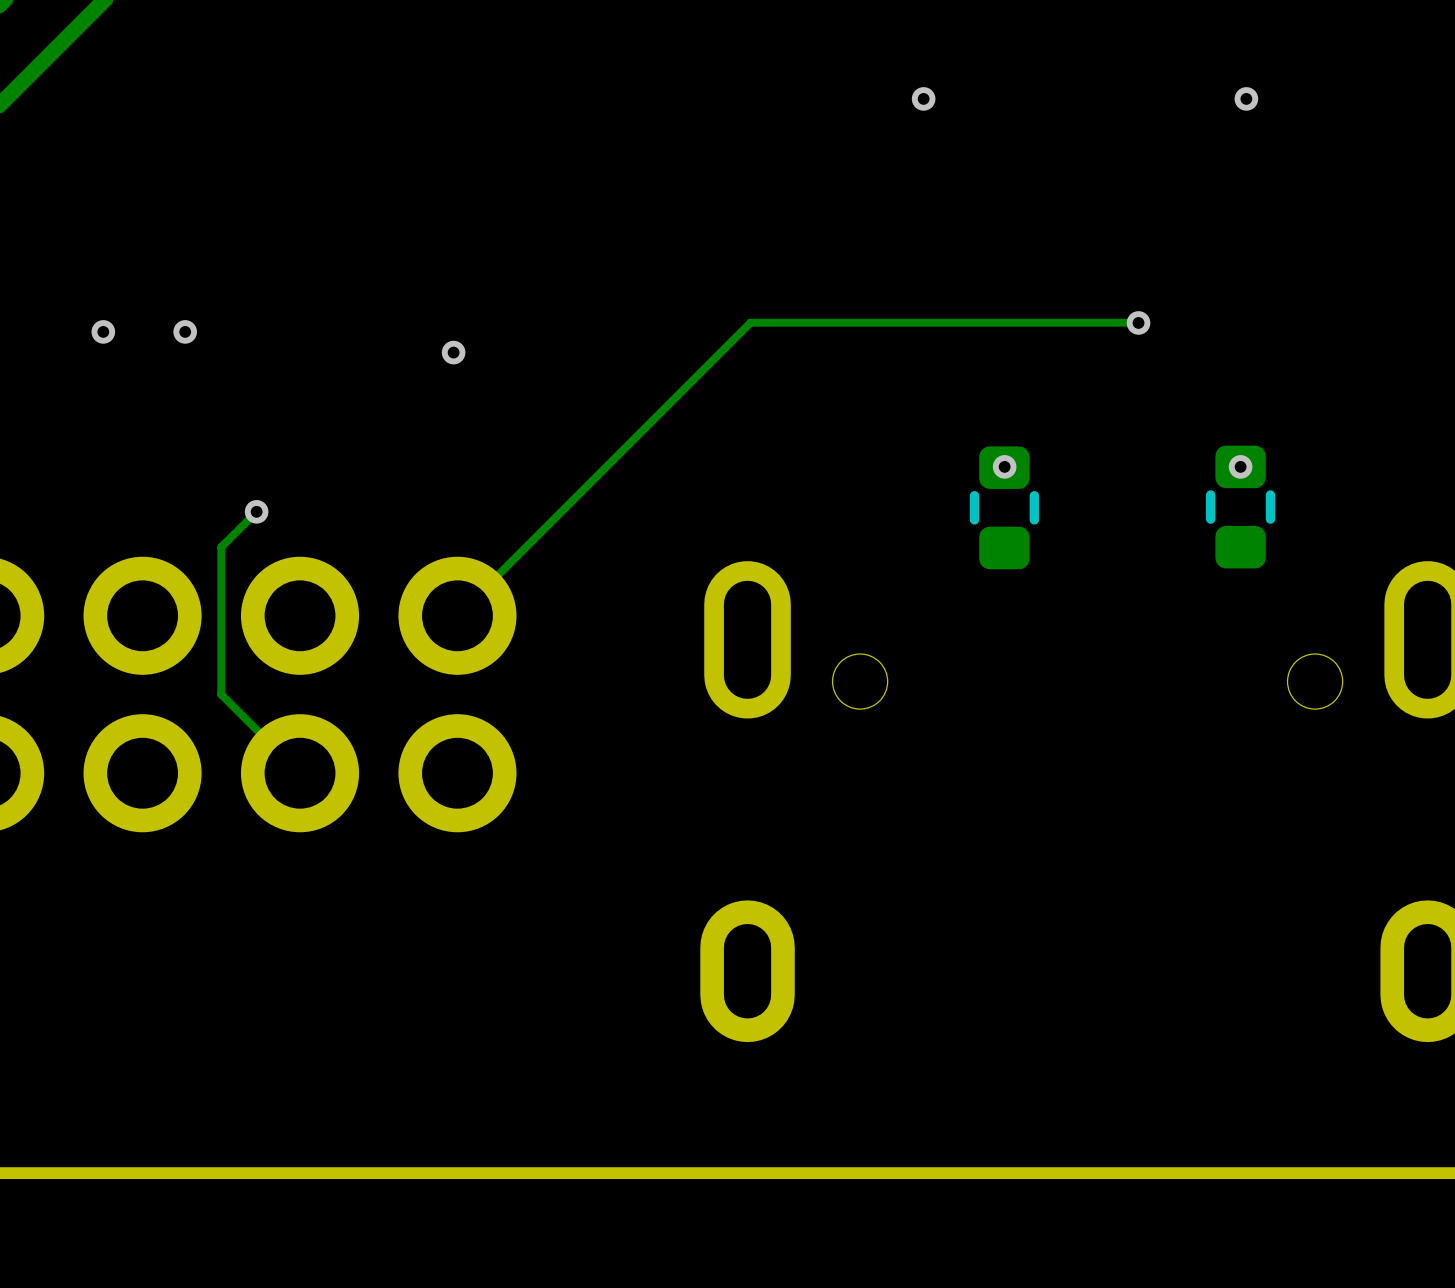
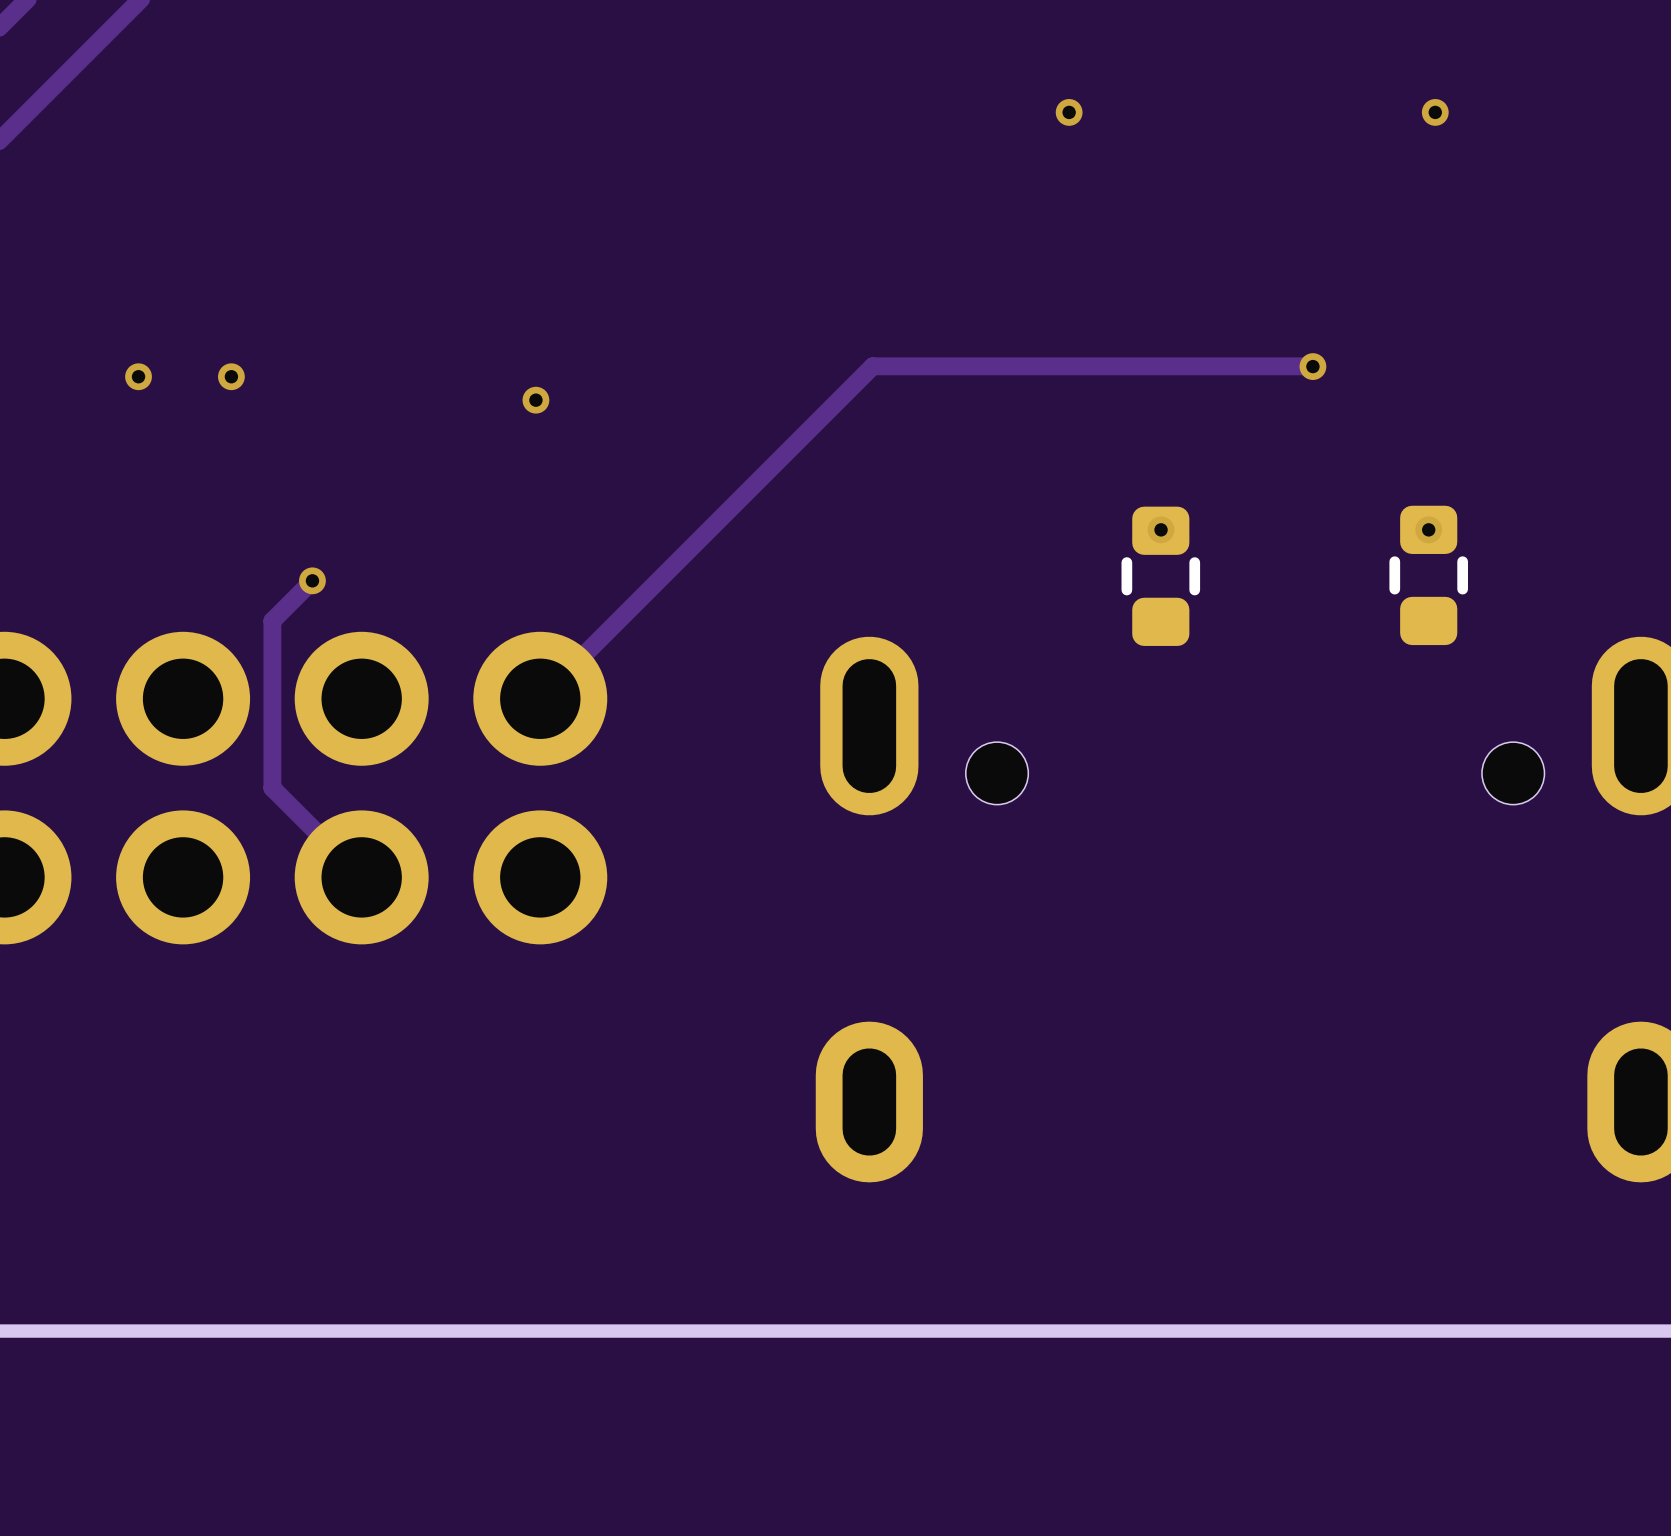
track width: thin (1138, 322) (750, 322) (457, 615) -> thick (1312, 366) (872, 366) (540, 698)
track width: thin (256, 511) (221, 547) (221, 694) (300, 773) -> thick (312, 580) (272, 620) (272, 788) (361, 877)

